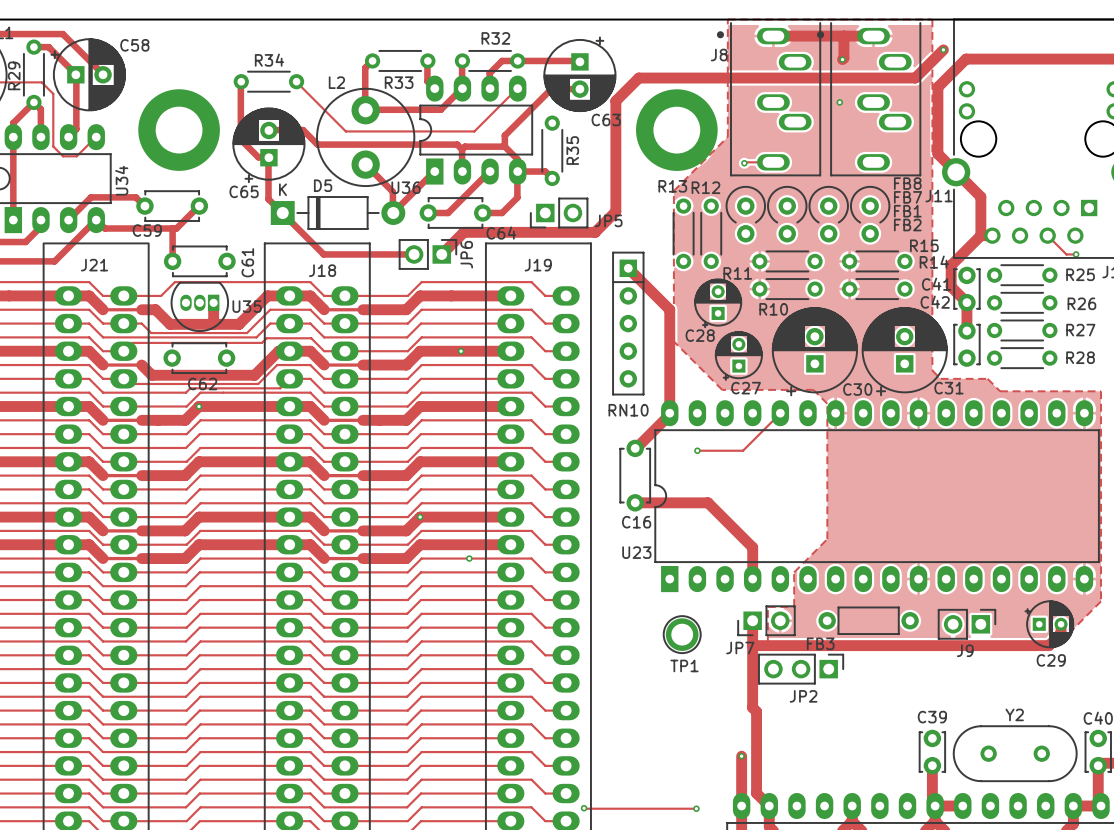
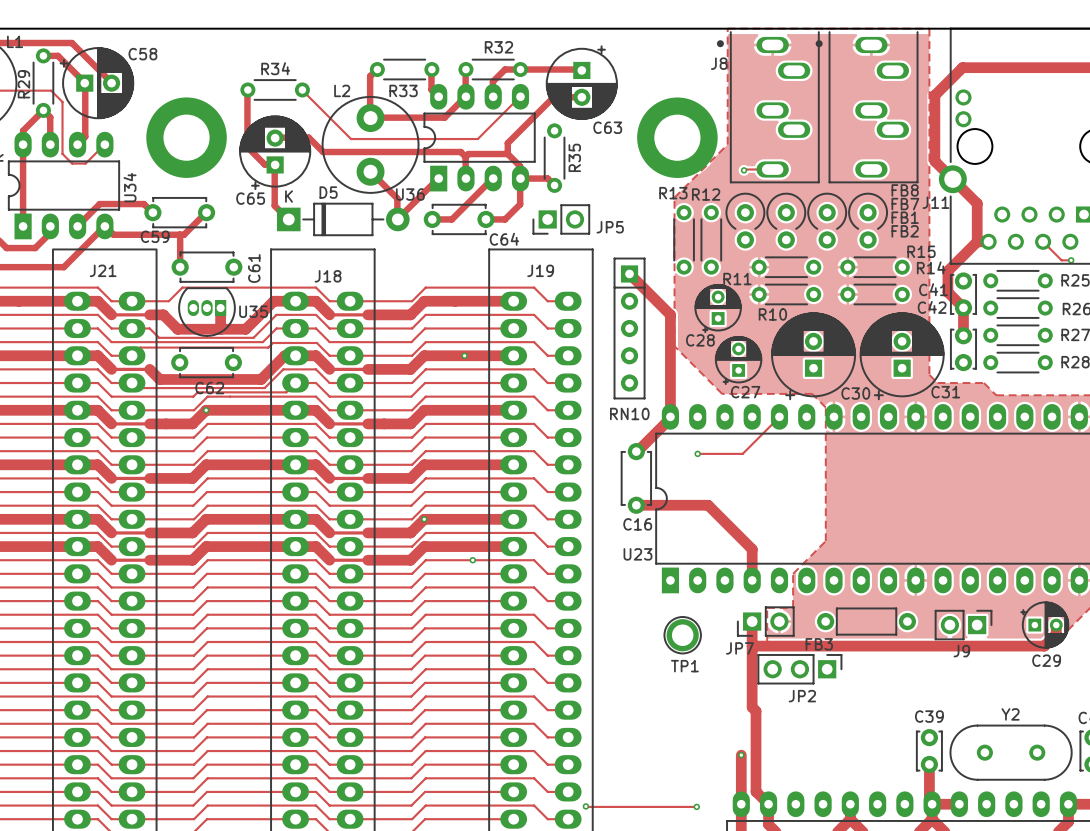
track: (773, 36) (873, 36) -> none
track: (843, 36) (842, 59) -> none
track: (943, 49) (915, 78) (638, 78) (615, 101) (615, 211) (595, 232) (463, 232) (441, 254) -> none
via: (943, 49) -> none
via: (842, 59) -> none
via: (839, 102) -> none
track: (282, 213) (323, 254) (414, 254) -> none
JP6: (427, 254) -> none

